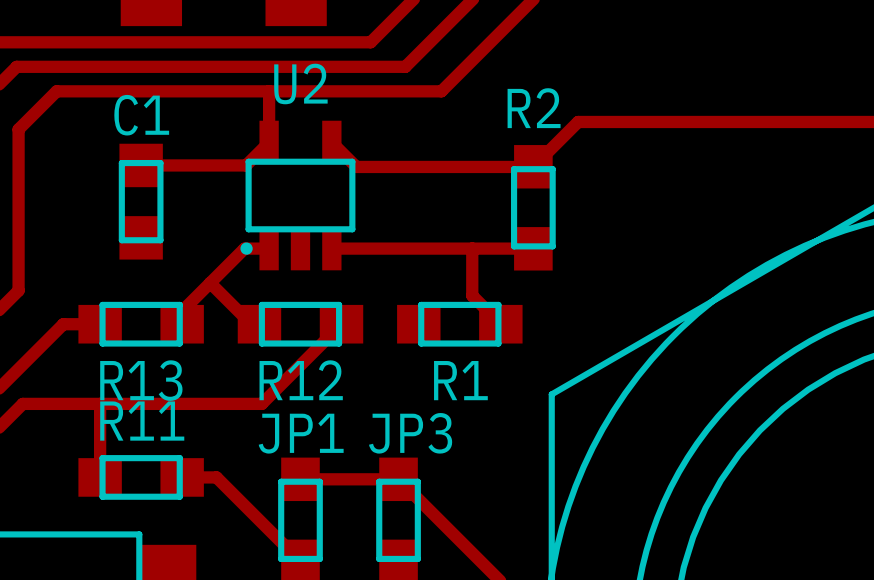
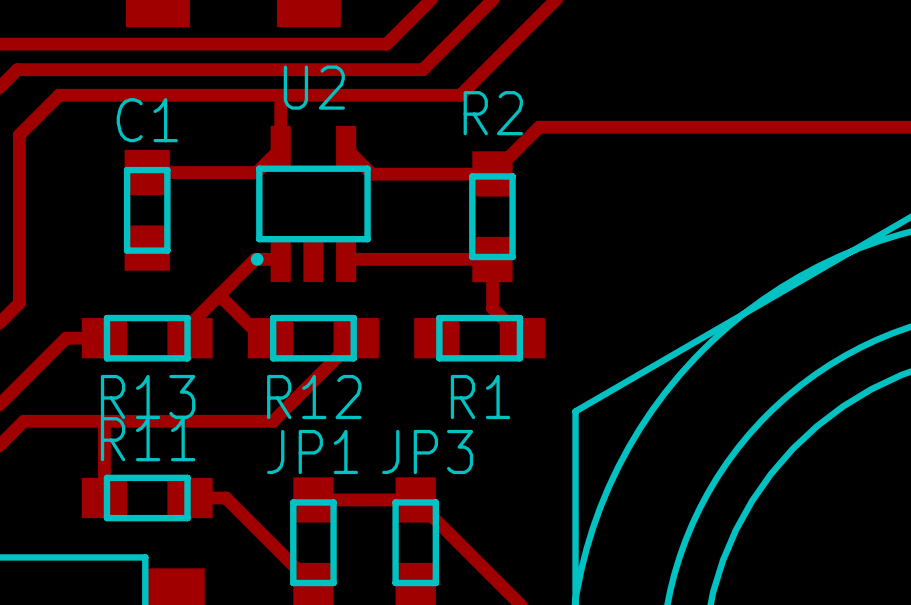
top track: (578, 121) (533, 166) (471, 166) -> (603, 127) (539, 127) (492, 174)
R2 position: (533, 207) -> (492, 216)
top track: (472, 248) (533, 248) -> none

